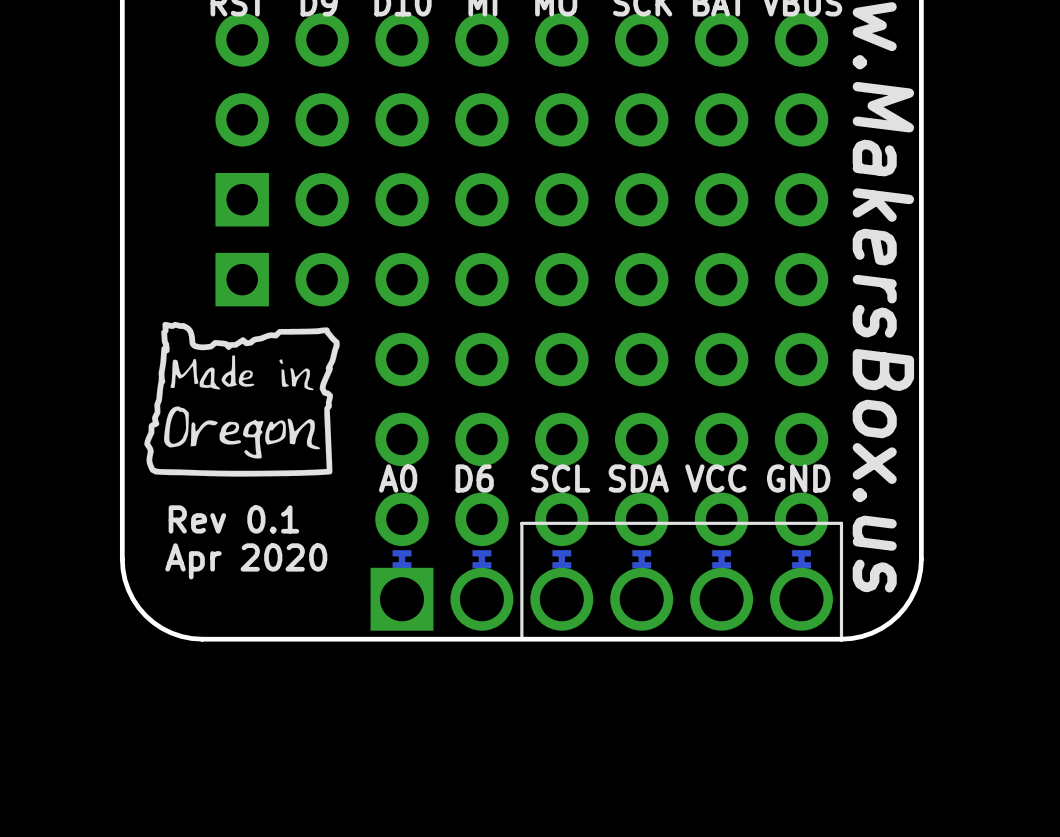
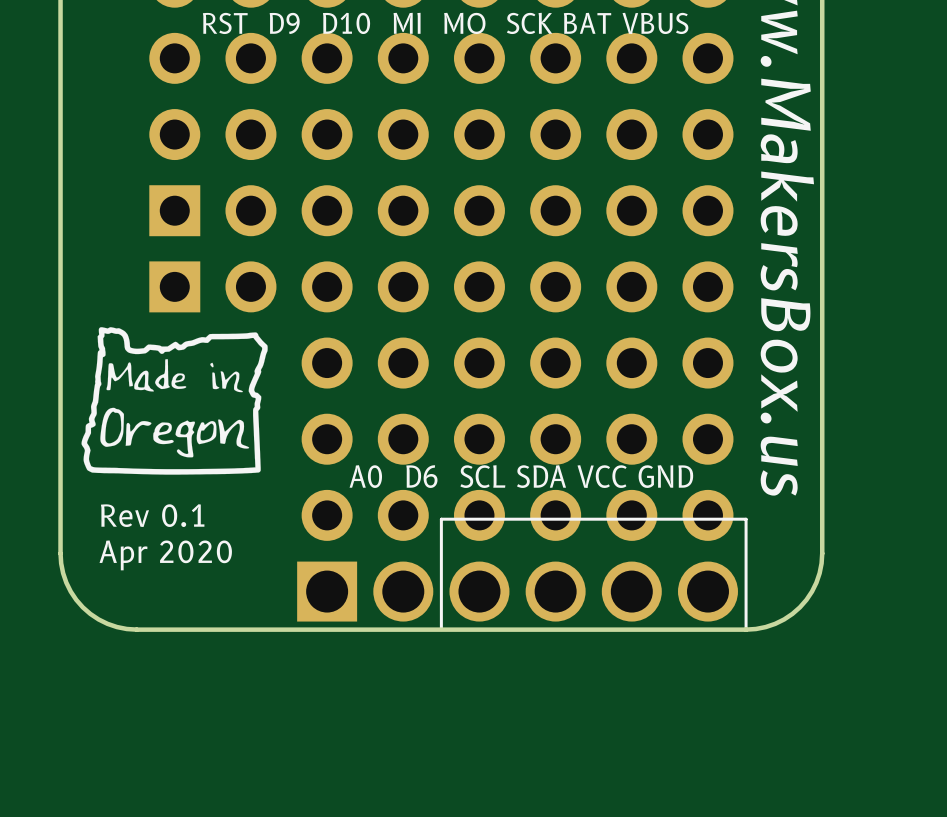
part: (402, 559) -> none
part: (481, 559) -> none
part: (561, 559) -> none
part: (641, 559) -> none
part: (721, 559) -> none
part: (801, 559) -> none

